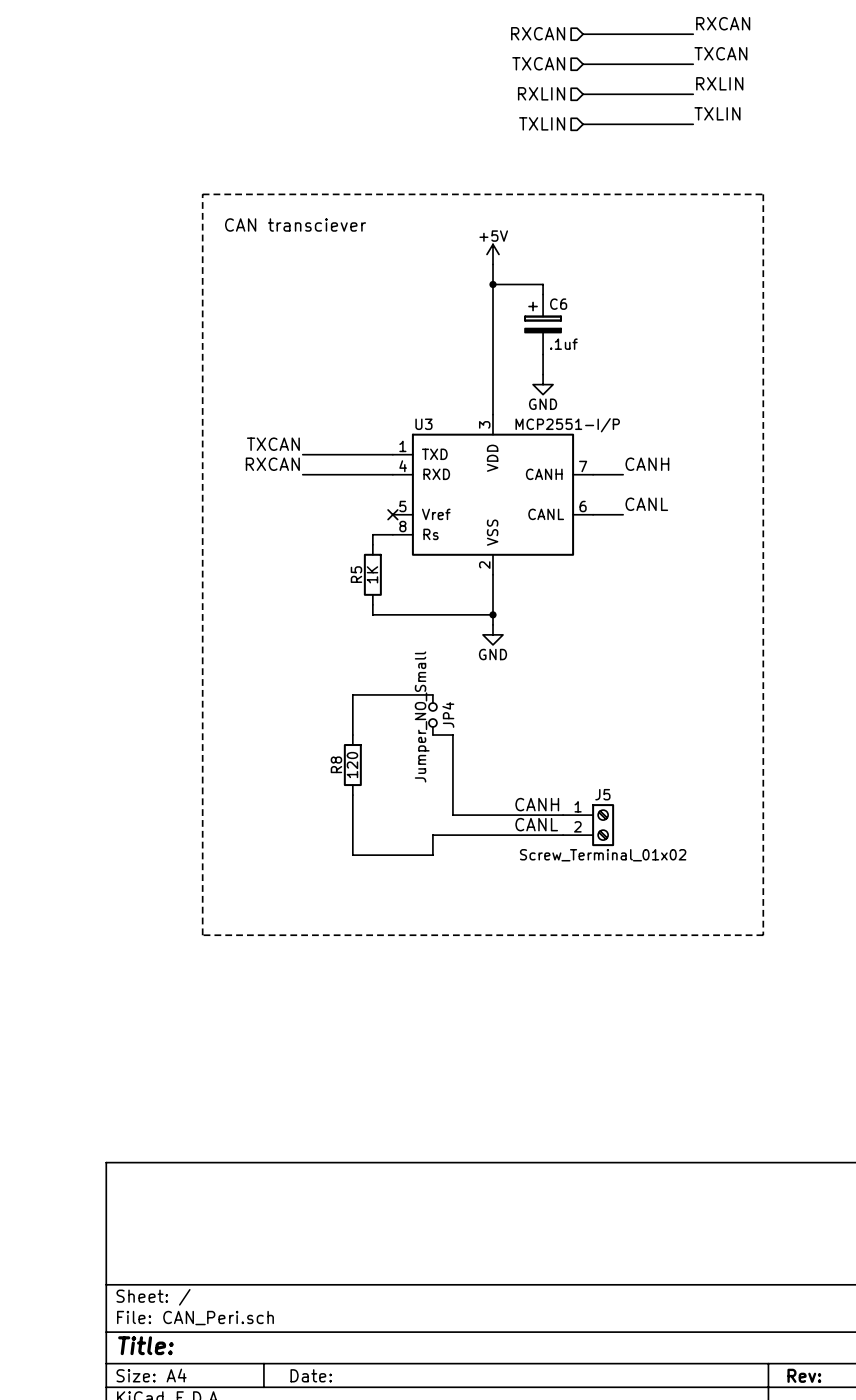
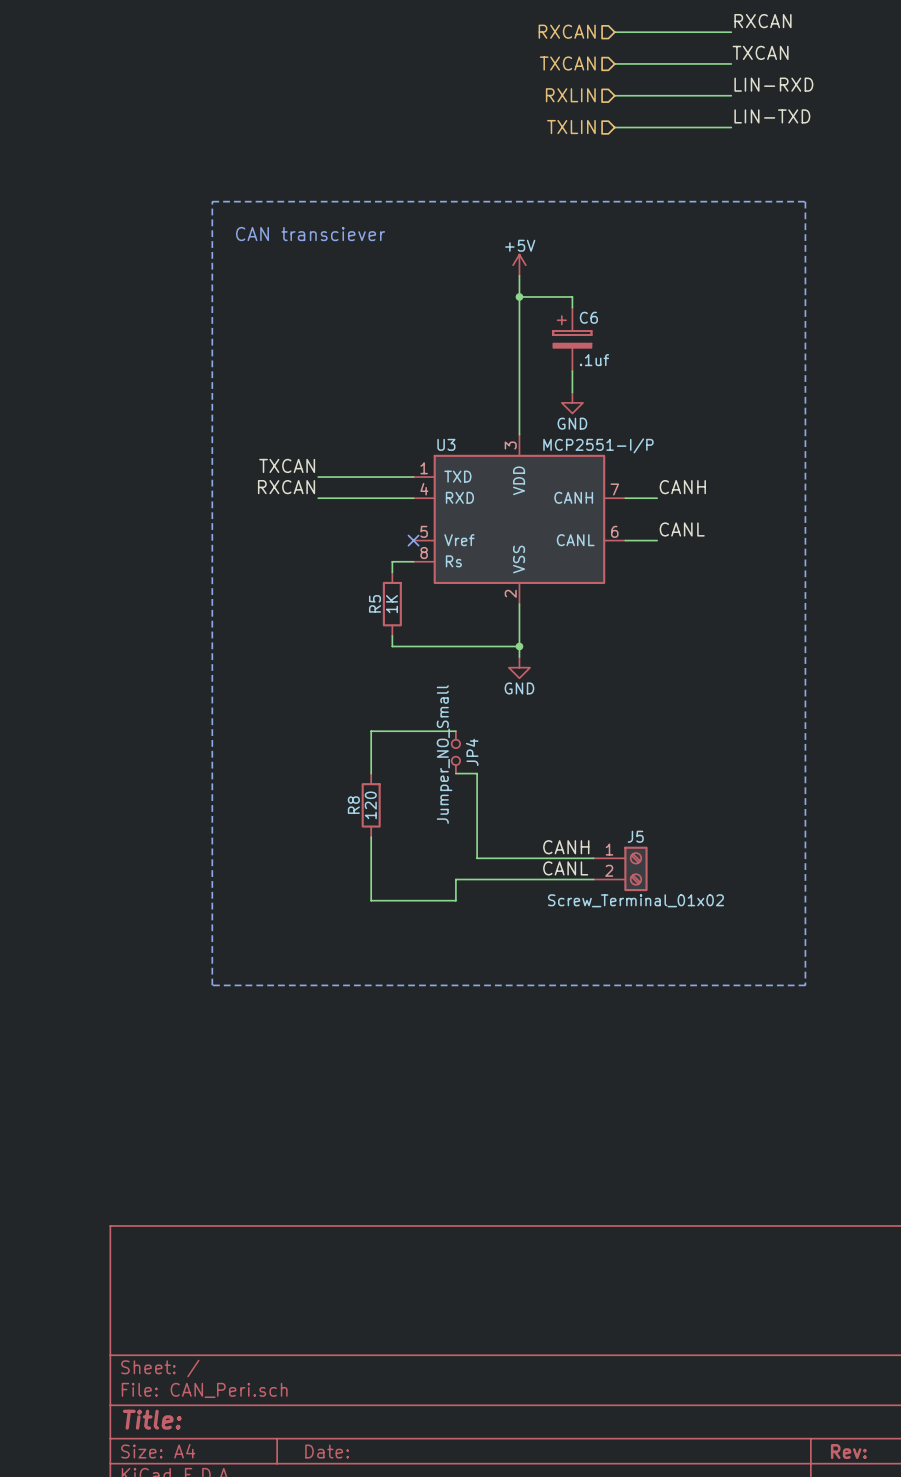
label: RXLIN (719, 83) -> LIN-RXD (773, 84)
label: TXLIN (717, 113) -> LIN-TXD (772, 116)

